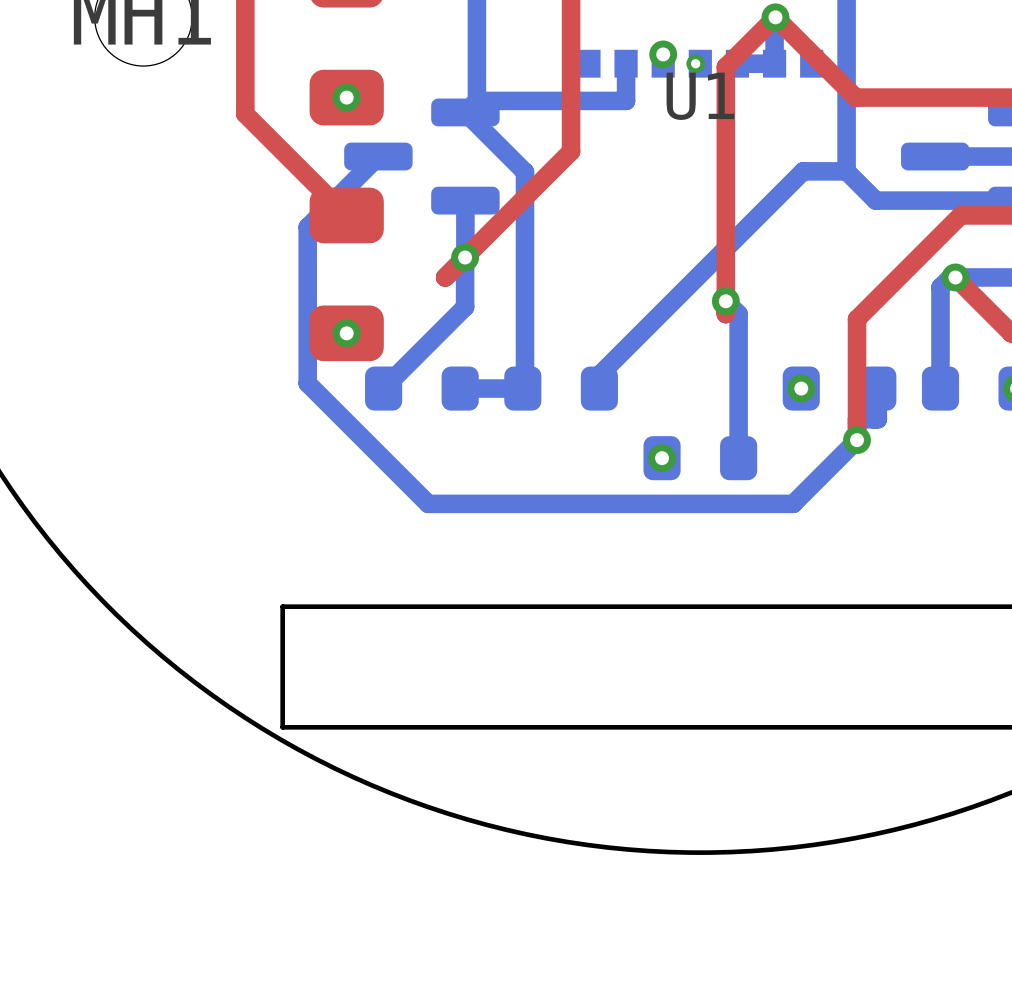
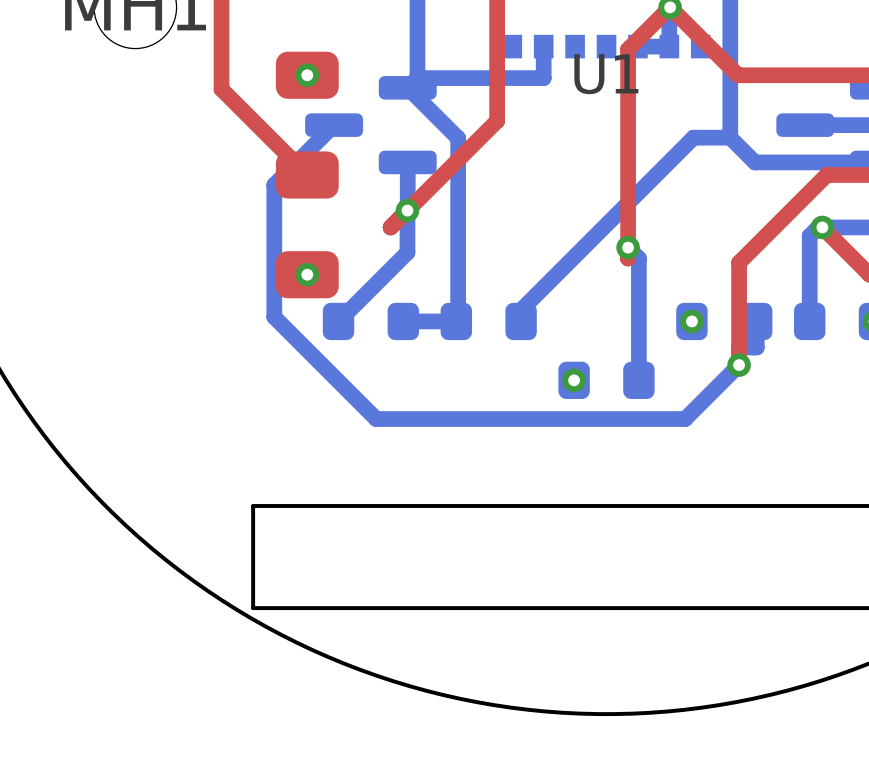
via: (663, 54) -> none
via: (695, 63) -> none

